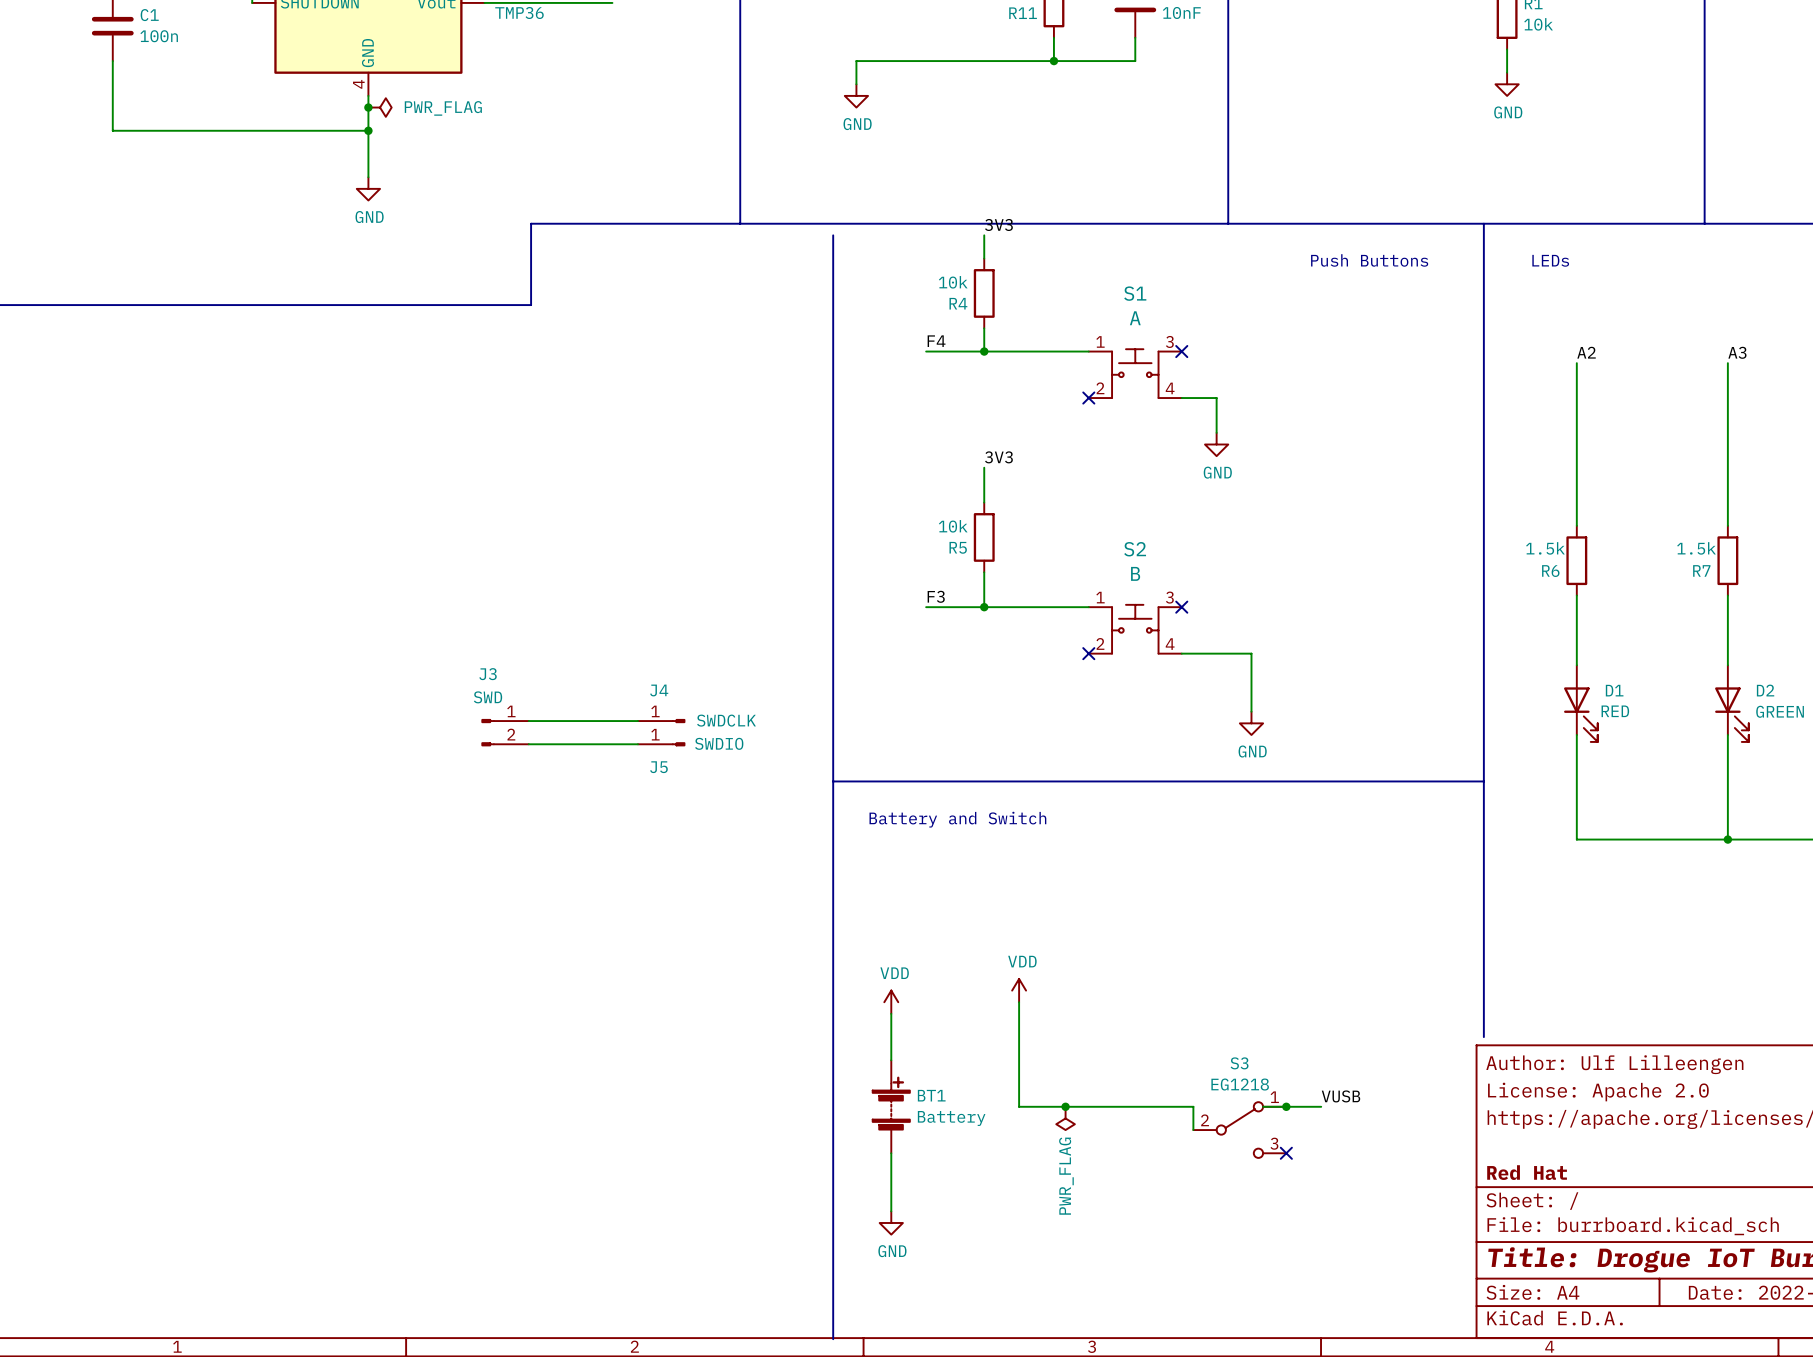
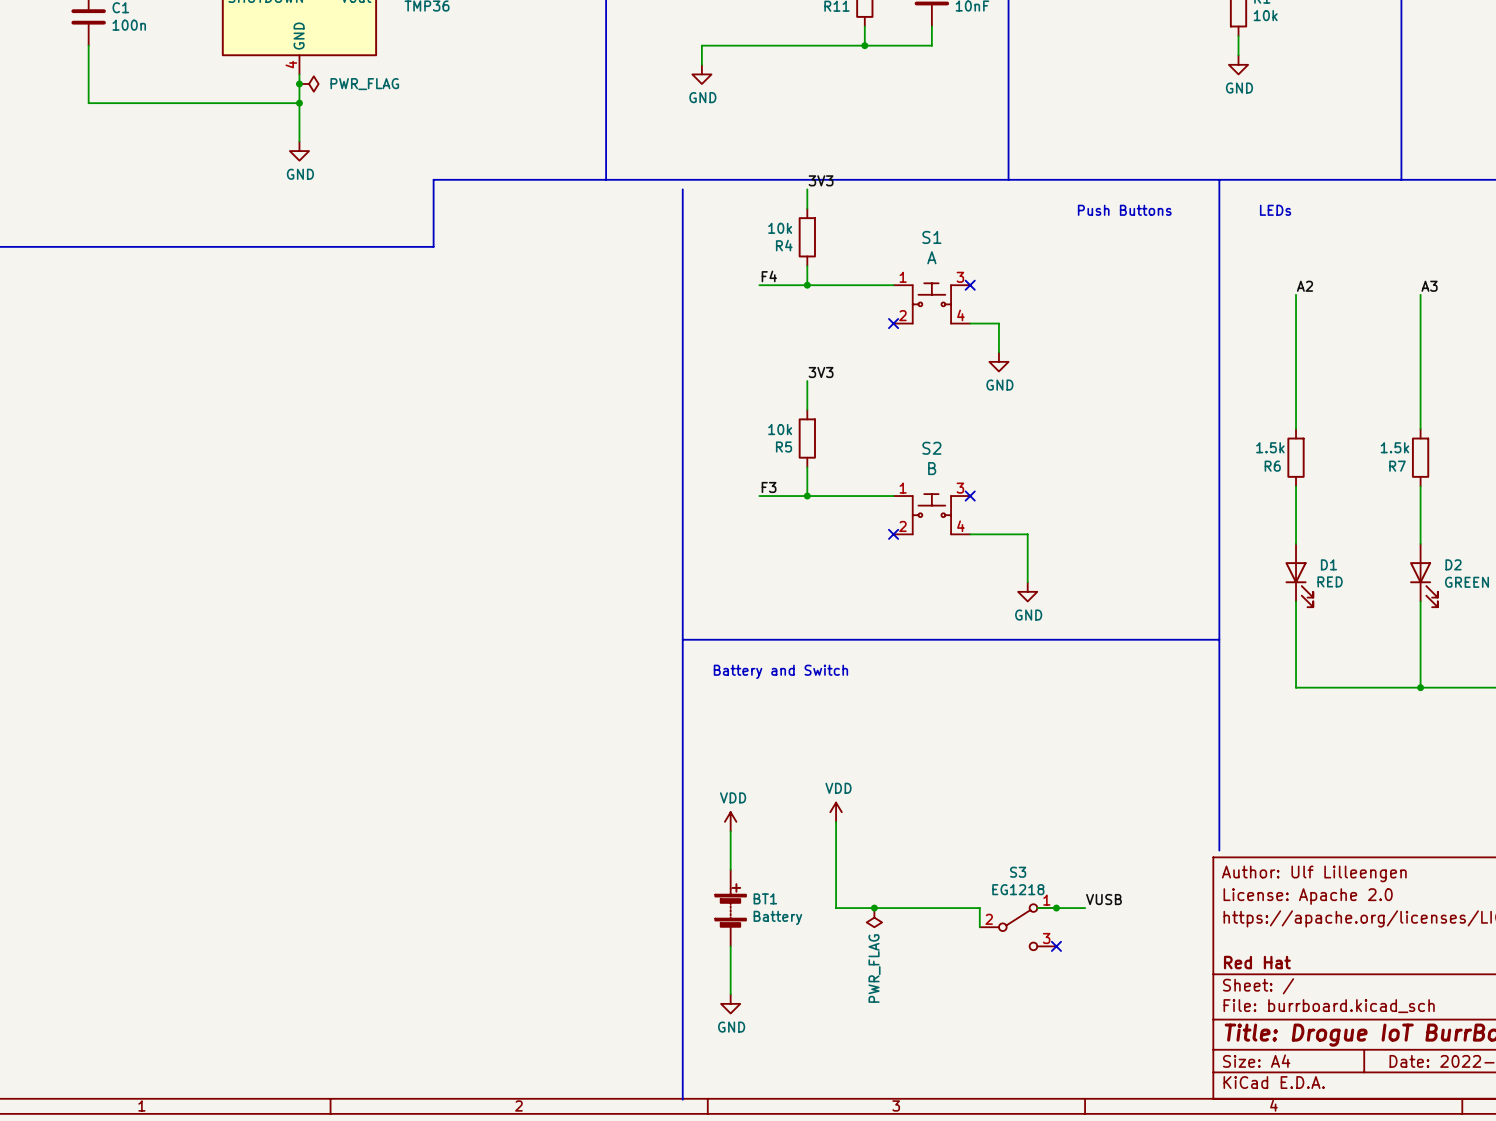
wire: (528, 721) (637, 721) -> none
J4: SWDCLK (661, 721) -> none
J3: SWD (505, 732) -> none
wire: (528, 744) (637, 744) -> none
J5: SWDIO (661, 744) -> none

